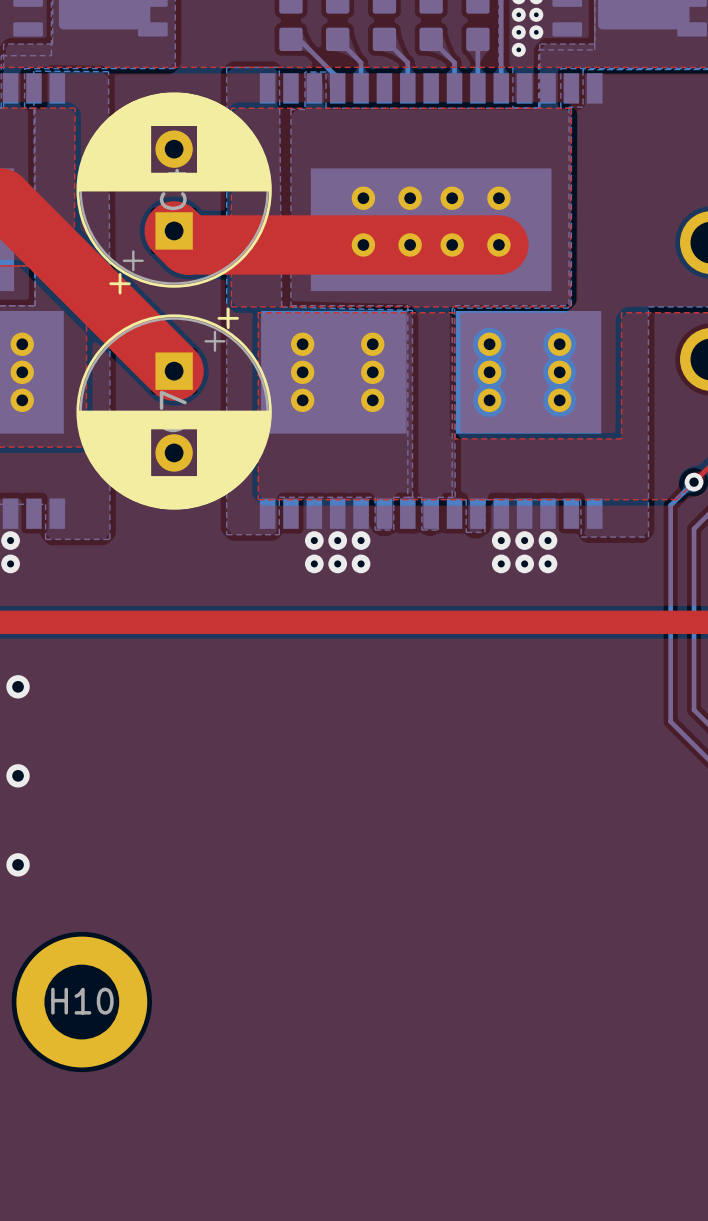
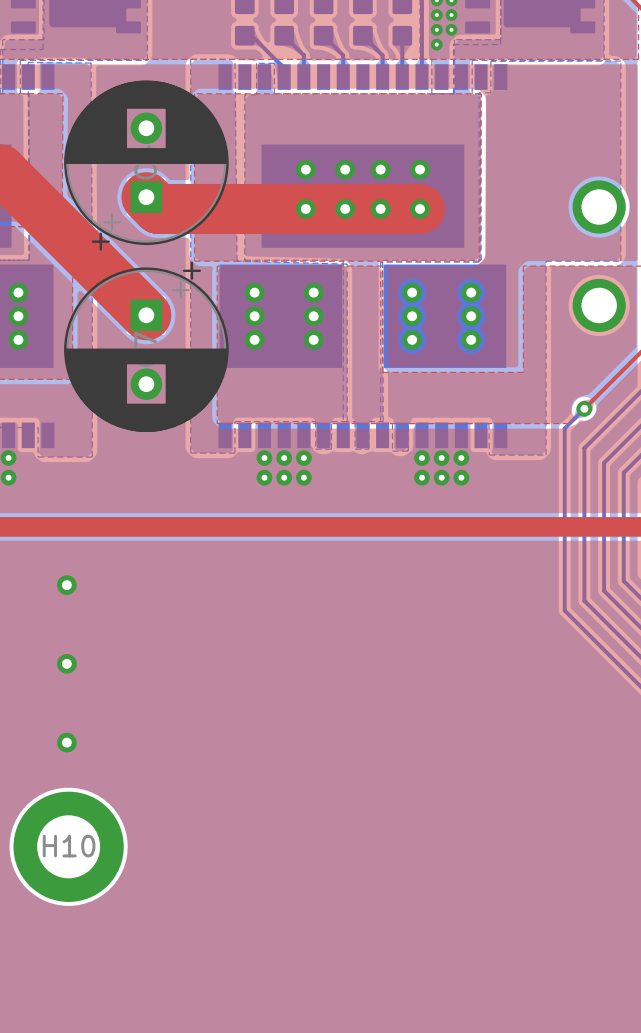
via: (18, 686) -> none
via: none -> (66, 585)
via: (18, 775) -> none
via: none -> (66, 663)
via: (18, 864) -> none
via: none -> (66, 742)

